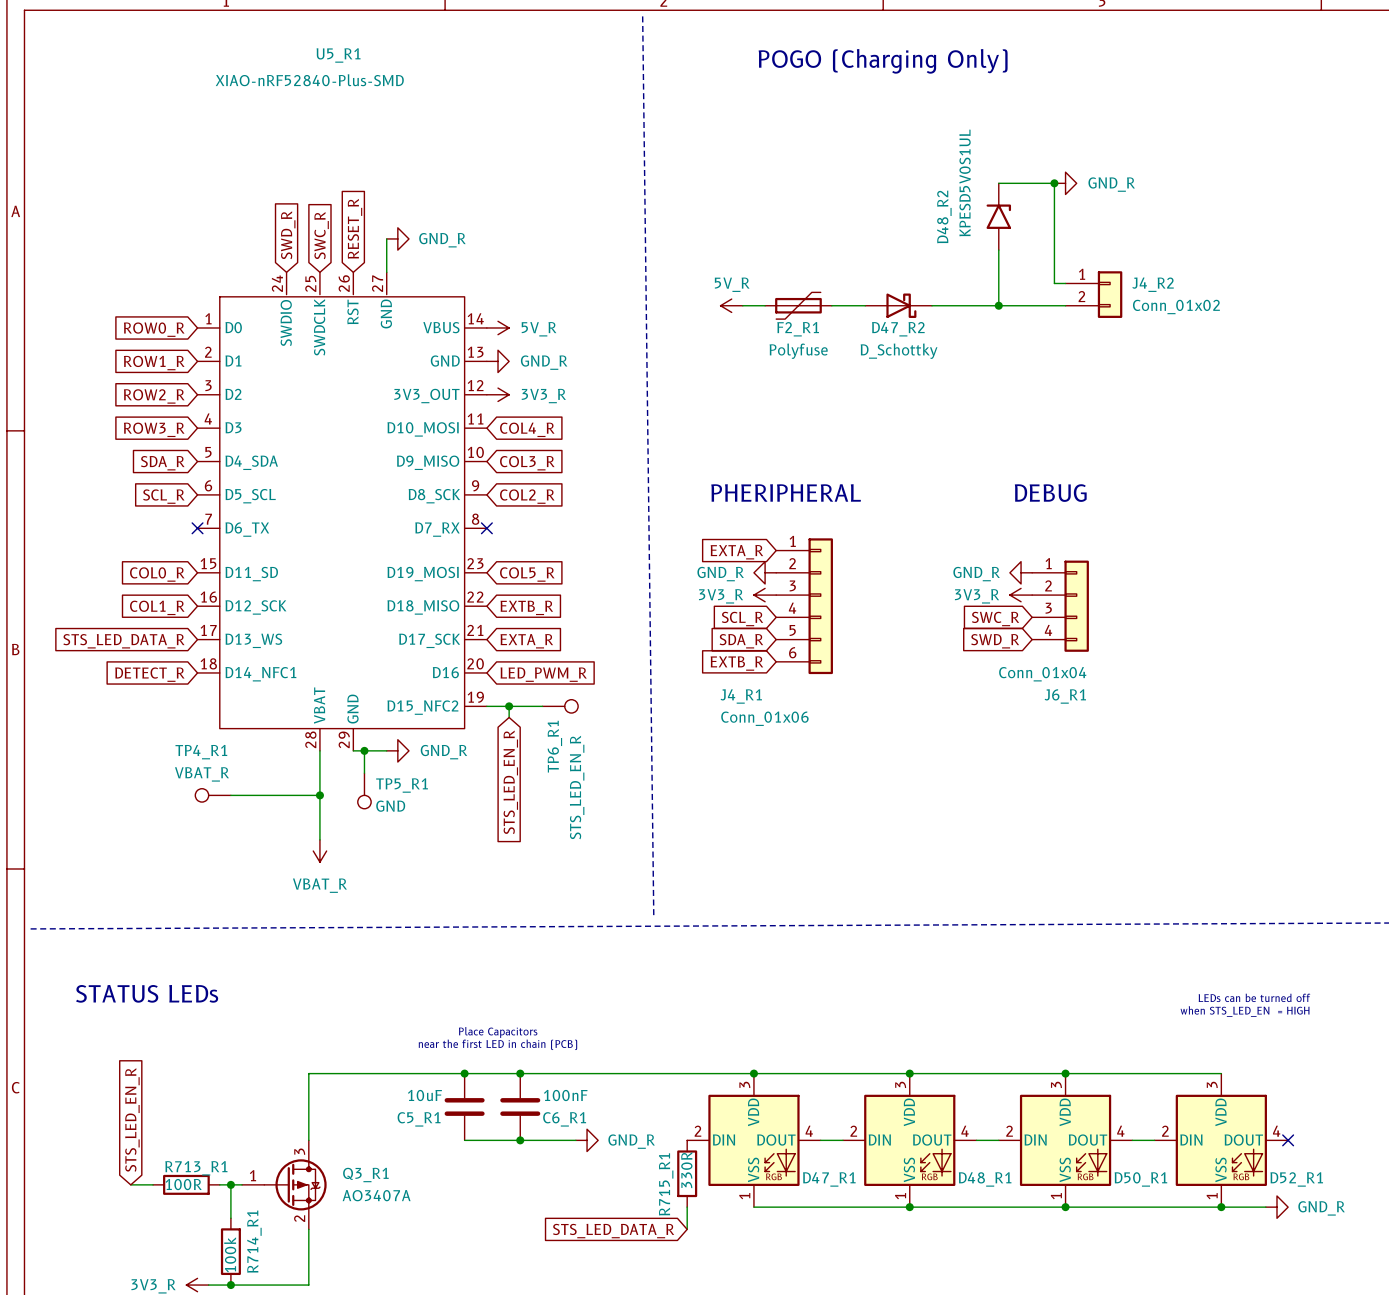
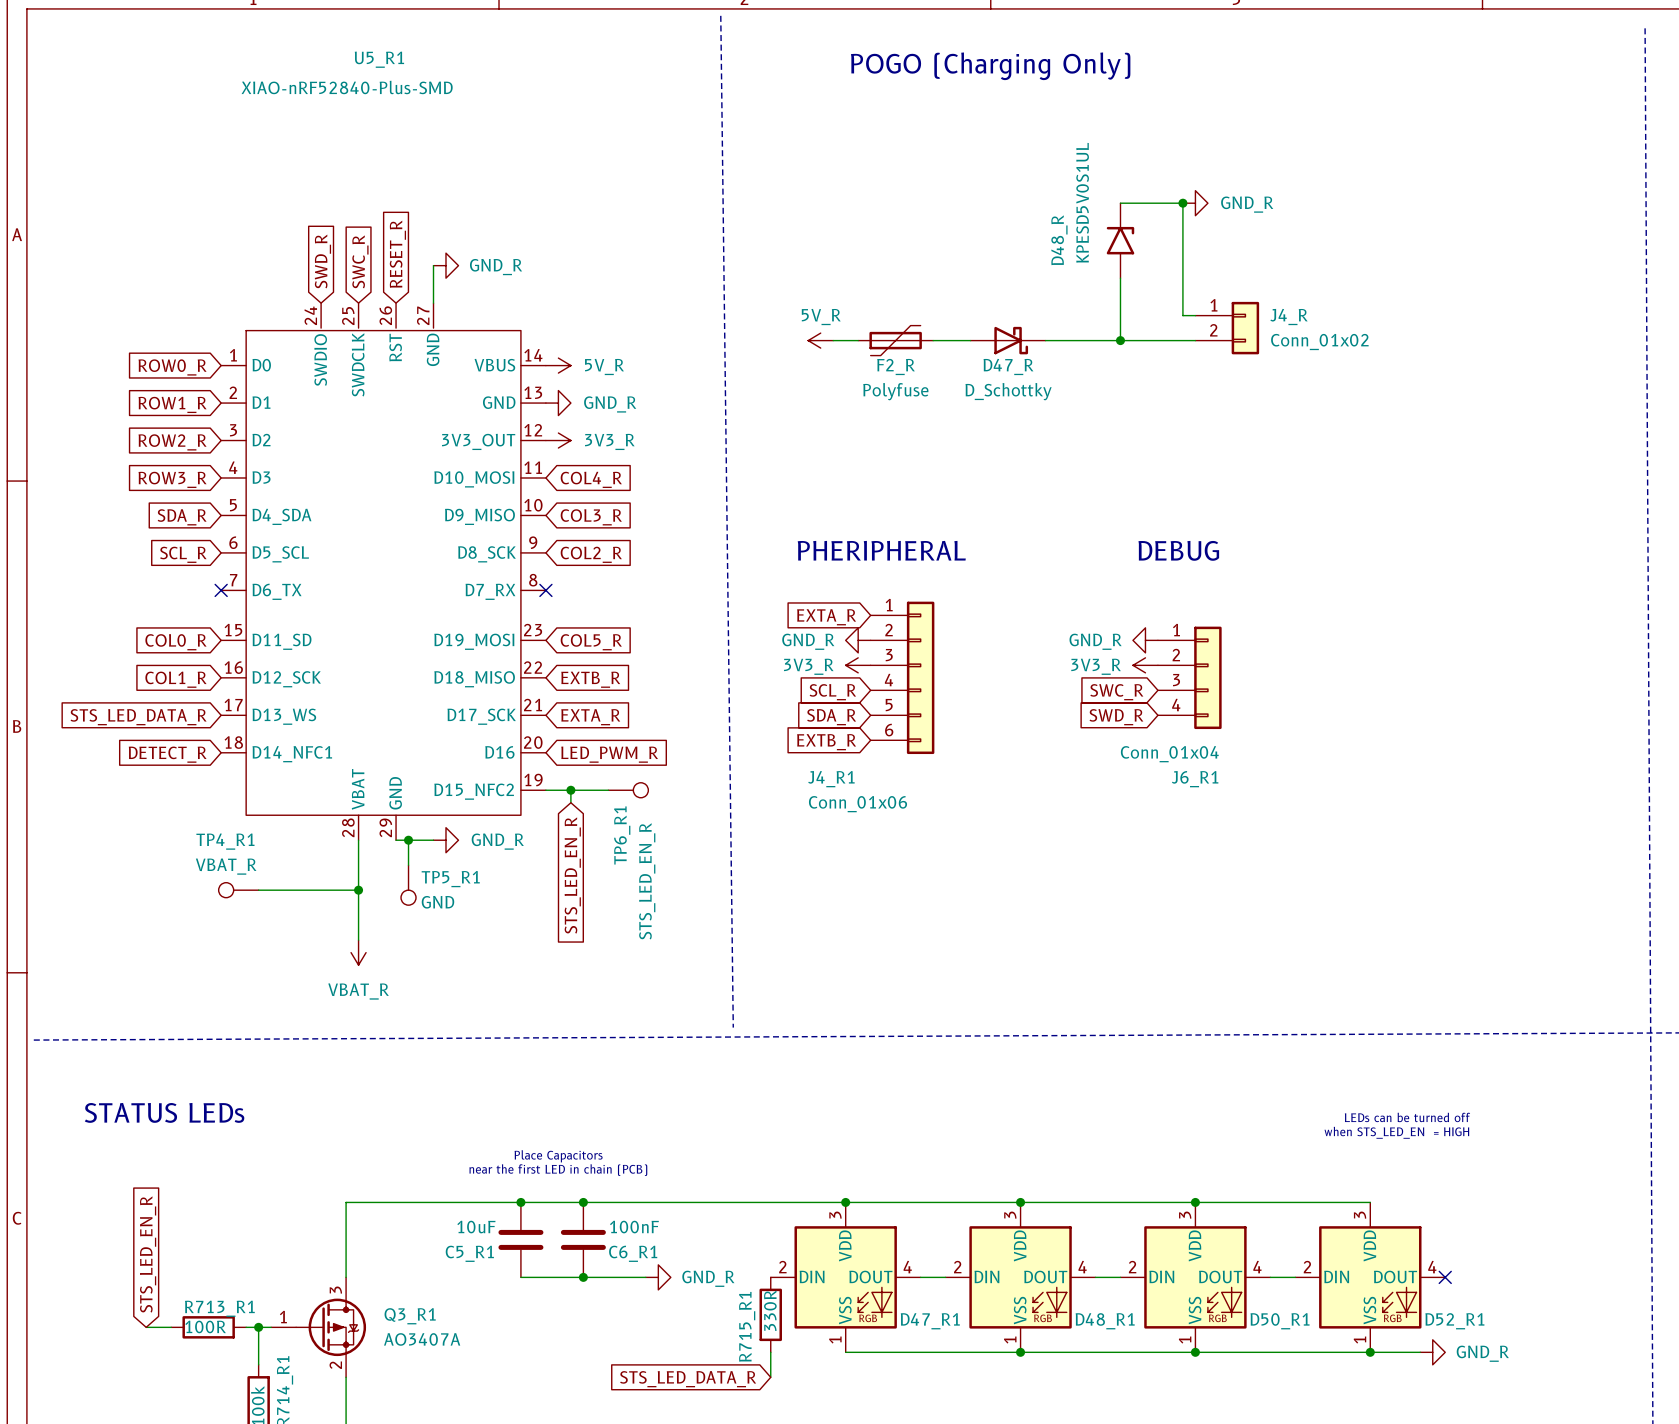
D48_R2 name: D48_R2 (944, 216) -> D48_R (1059, 240)
J4_R2 name: J4_R2 (1153, 284) -> J4_R (1288, 317)
F2_R1 name: F2_R1 (798, 329) -> F2_R (896, 366)
D47_R2 name: D47_R2 (898, 329) -> D47_R (1008, 366)

